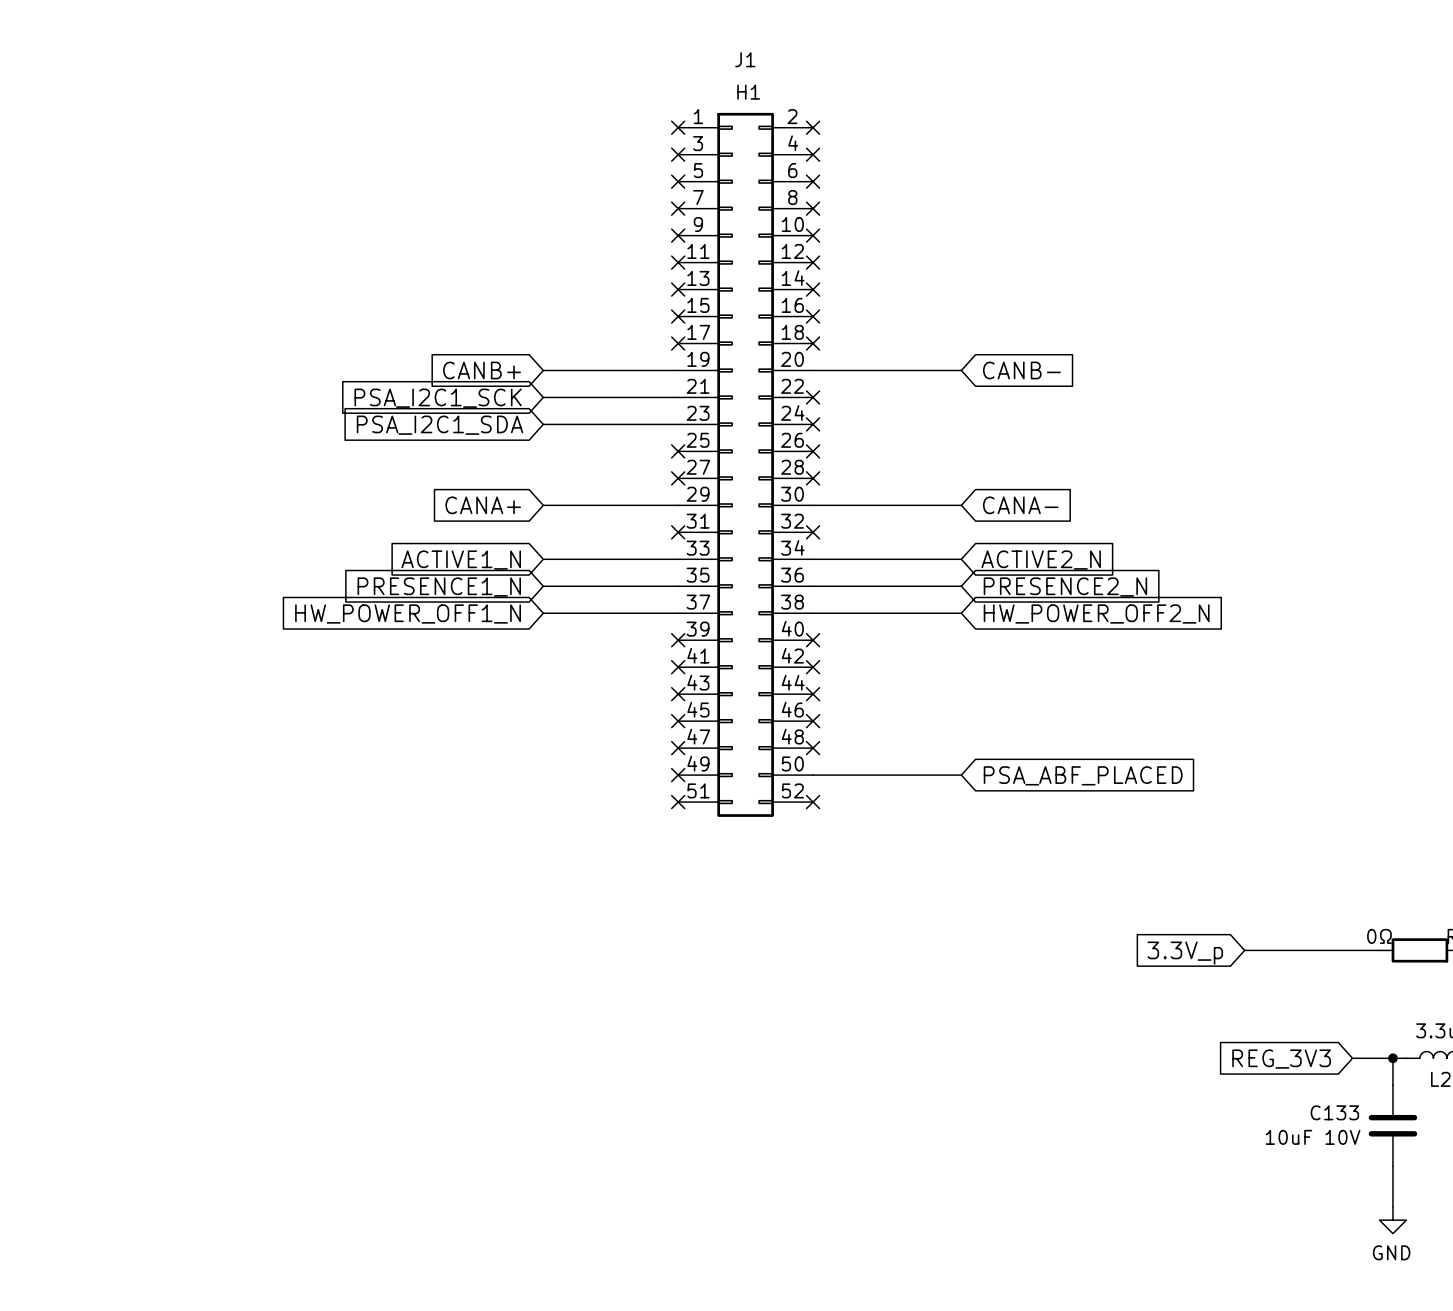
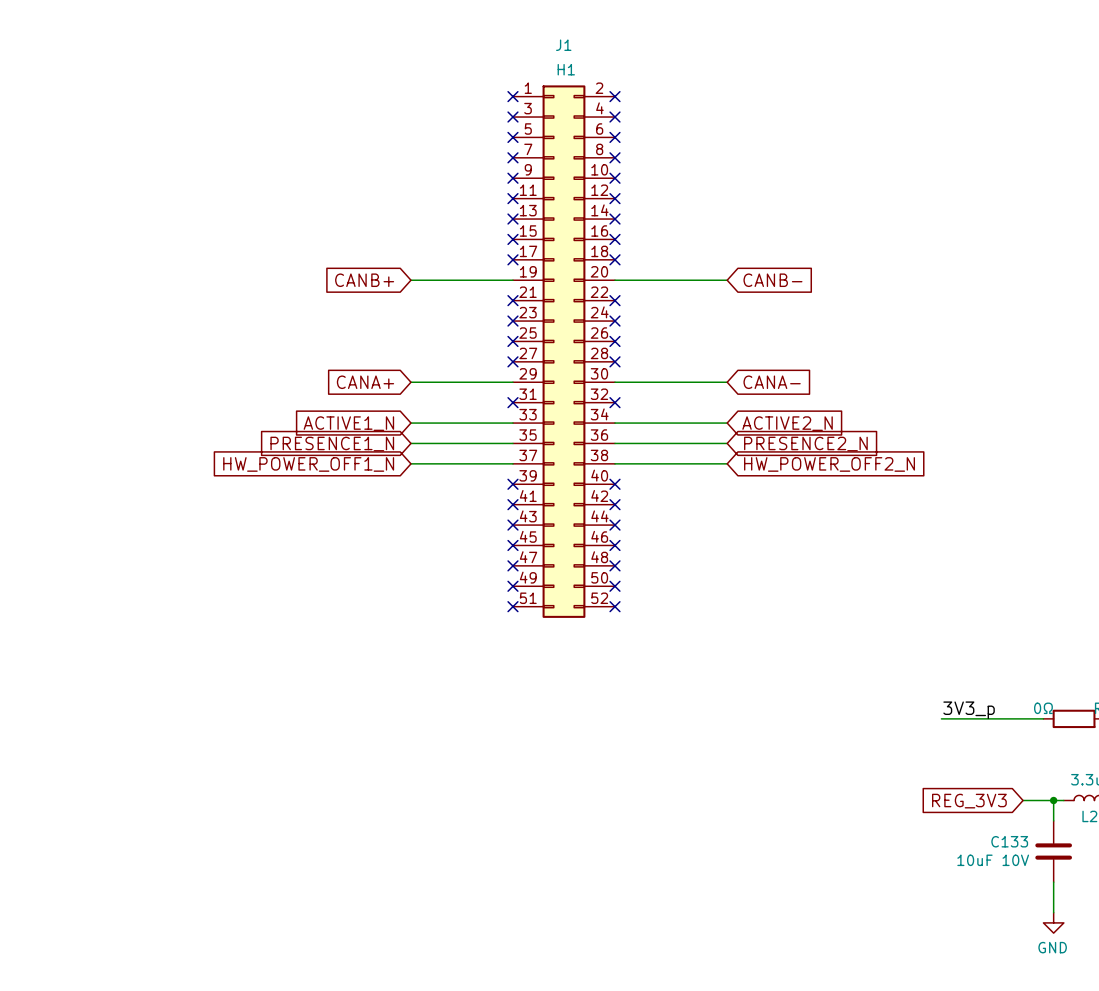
wire: (543, 397) (678, 397) -> none
no-connect mark: none -> (512, 300)
global label: PSA_I2C1_SCK (438, 398) -> none
wire: (543, 424) (678, 424) -> none
no-connect mark: none -> (512, 321)
global label: PSA_I2C1_SDA (440, 425) -> none
wire: (813, 775) (961, 775) -> none
no-connect mark: none -> (614, 586)
global label: PSA_ABF_PLACED (1083, 775) -> none
label: none -> 3V3_p (969, 710)
global label: 3.3V_p (1185, 953) -> none

